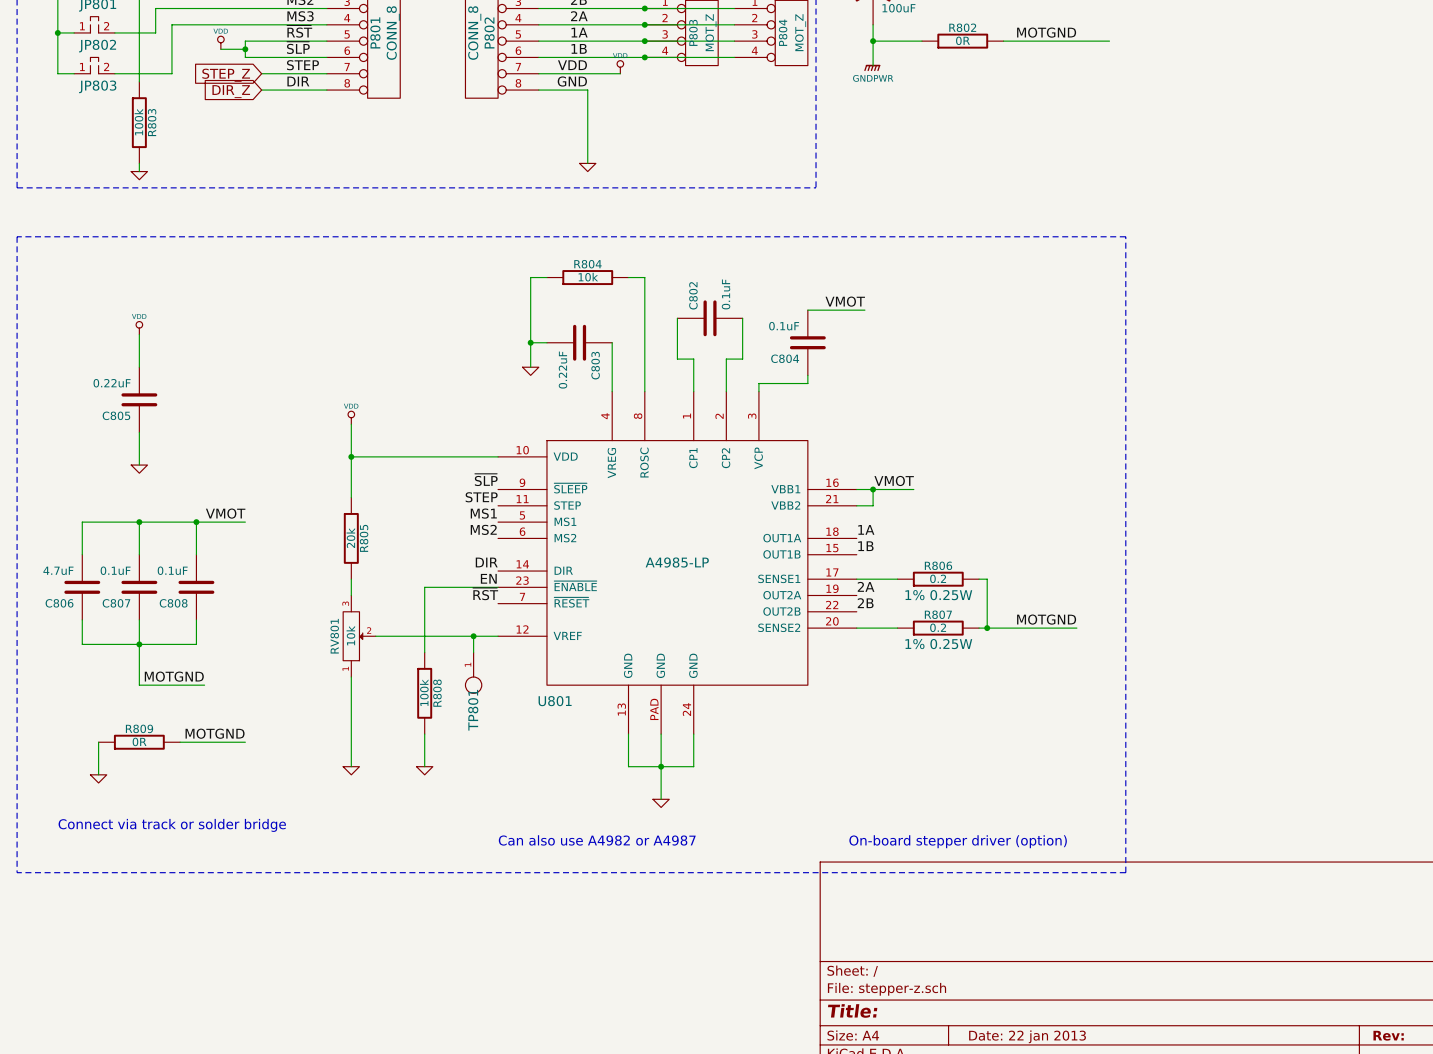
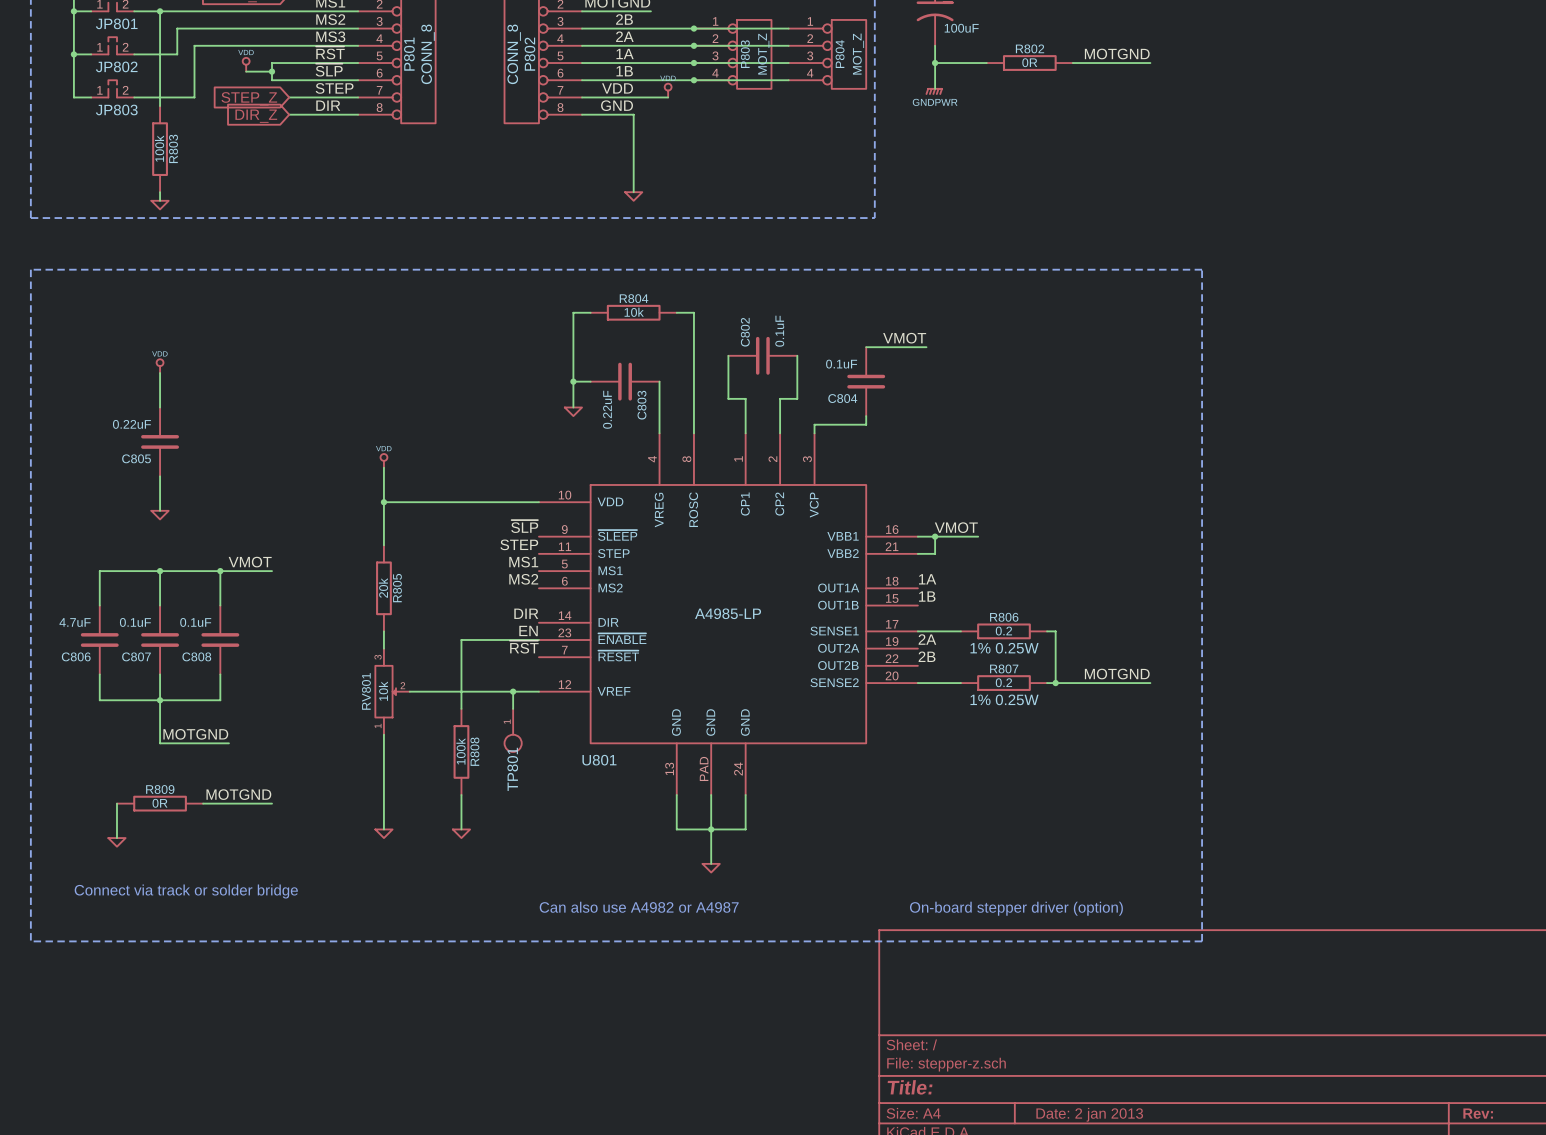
wire: (1076, 41) (1109, 41) -> none
title block: Date: 22 jan 2013 (1027, 1036) -> Date: 2 jan 2013 (1089, 1114)

